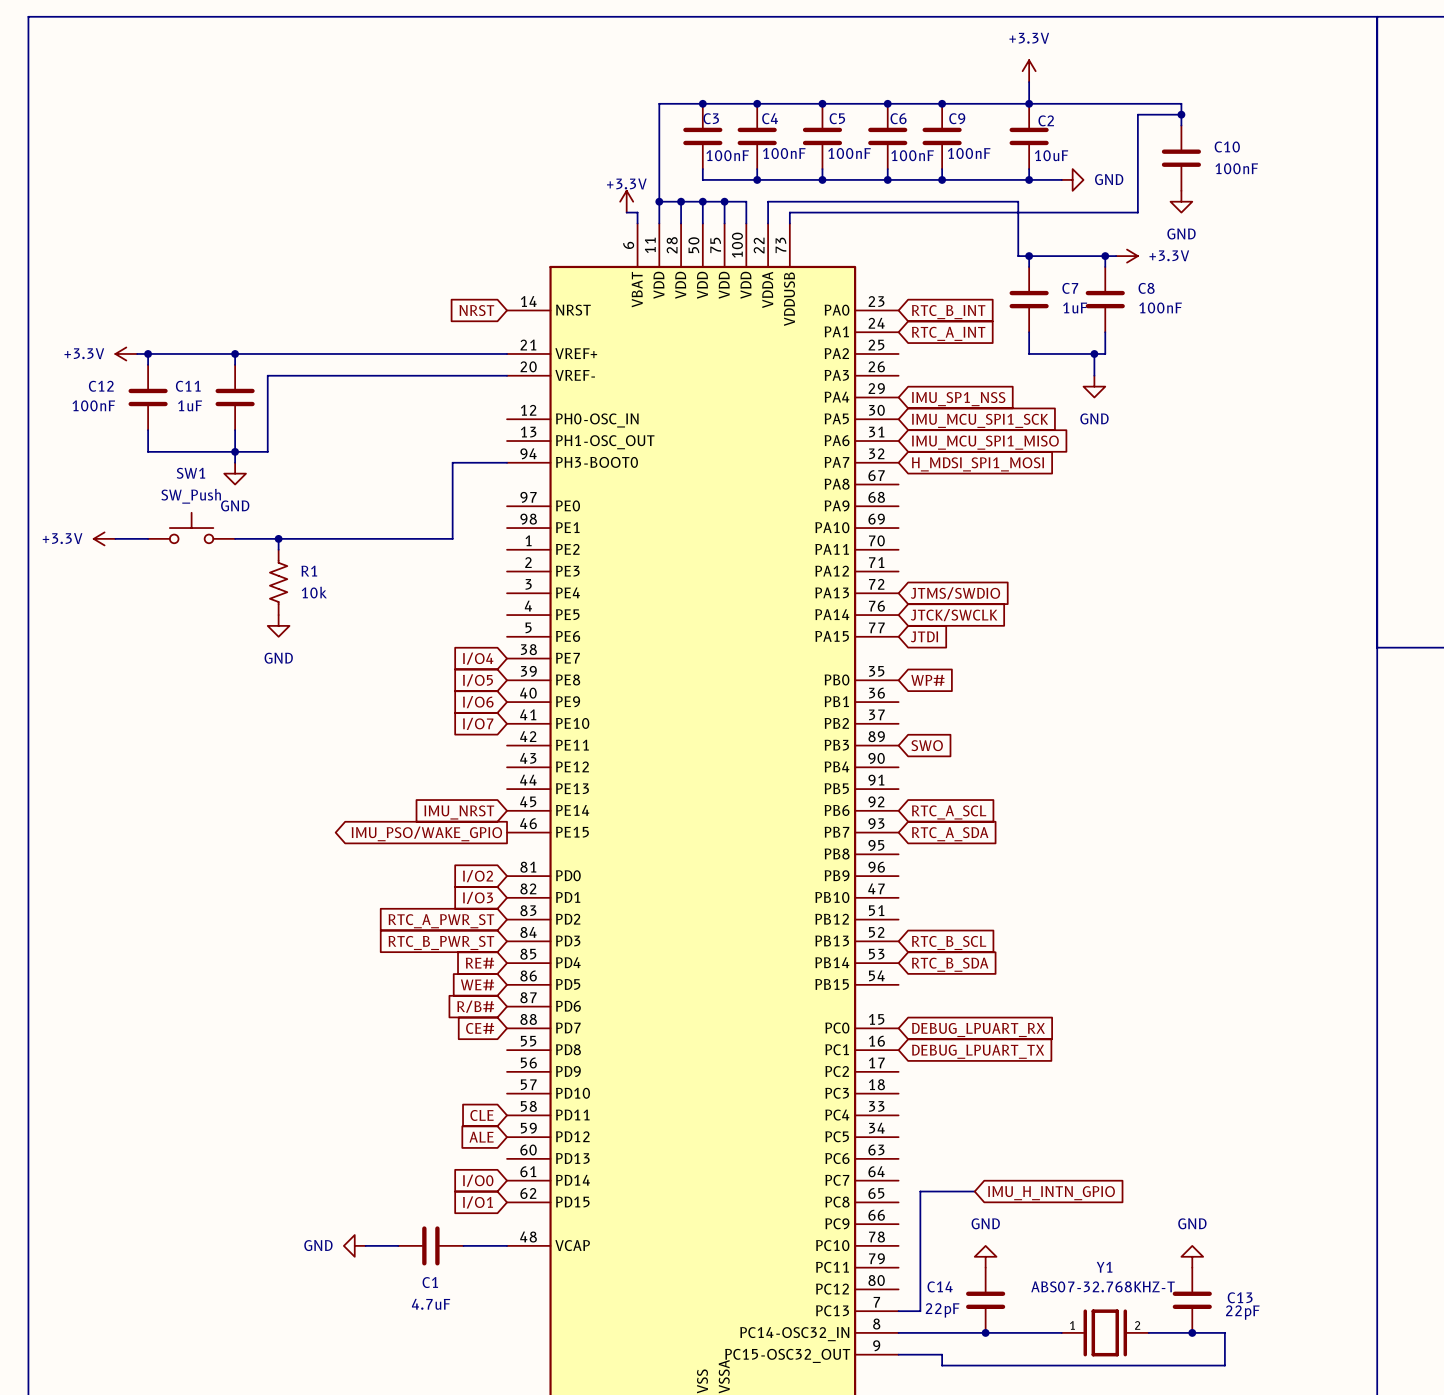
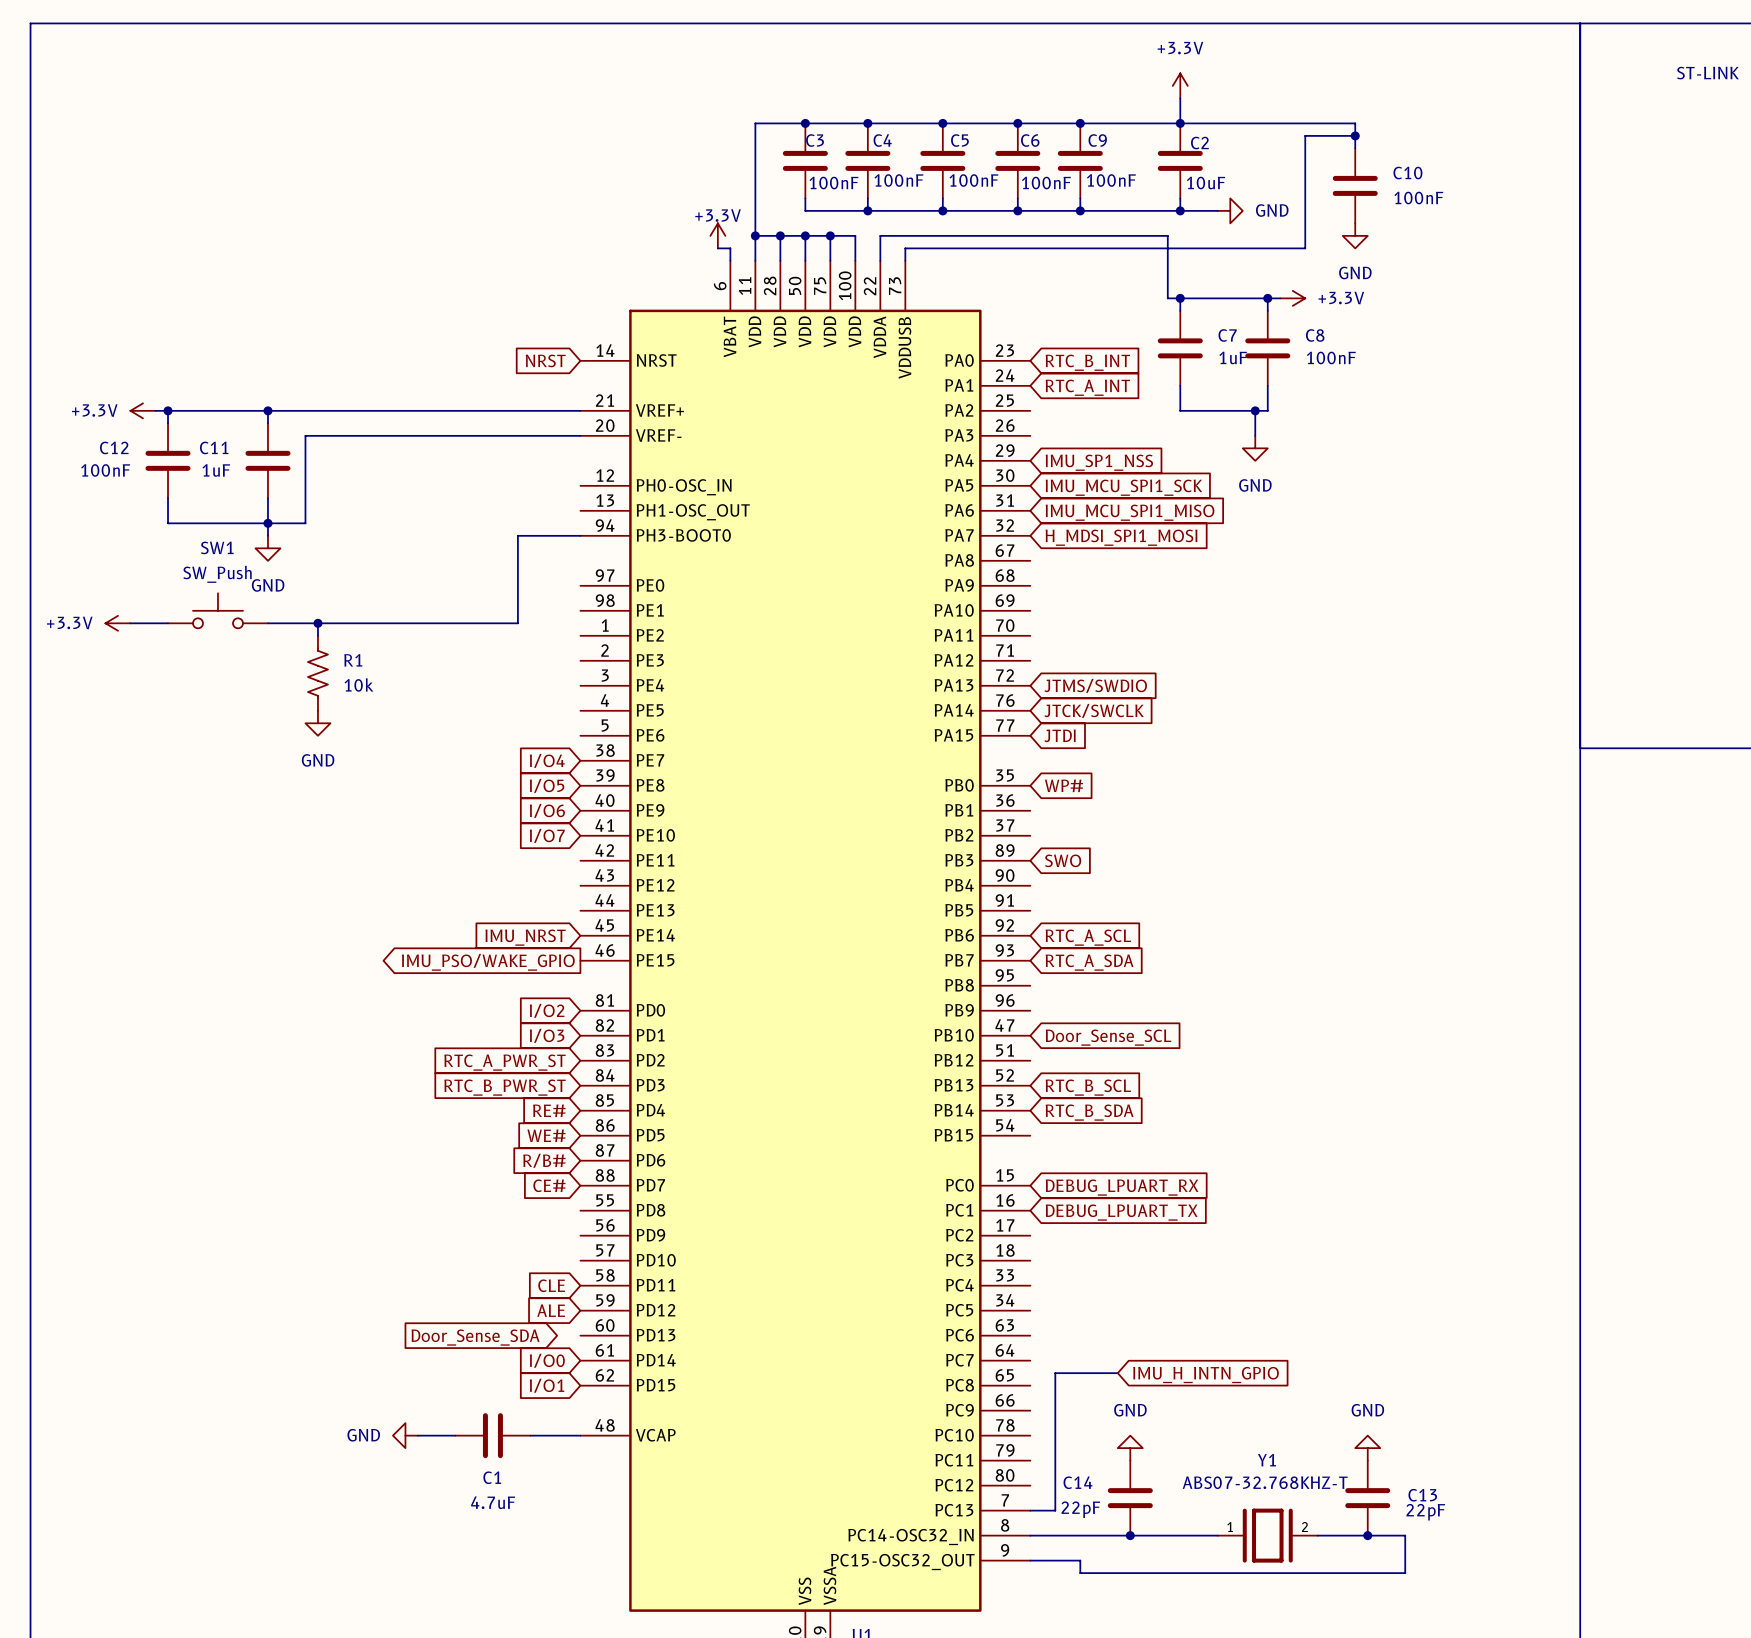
global label: none -> Door_Sense_SCL (1108, 1037)
global label: none -> Door_Sense_SDA (475, 1337)

